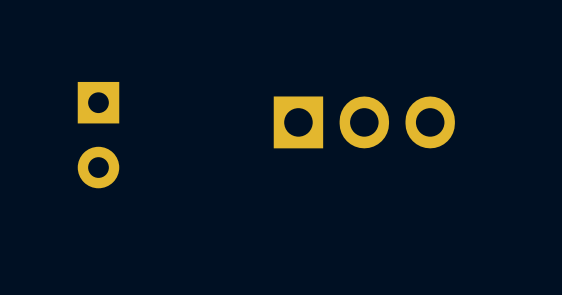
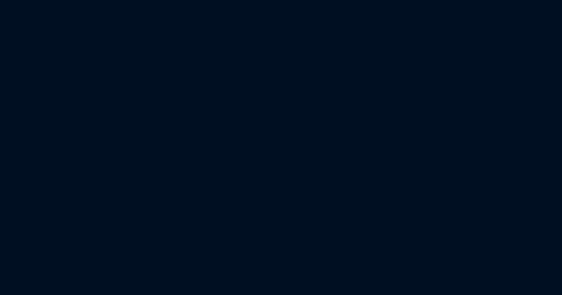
part: (364, 122) -> none
part: (98, 135) -> none

